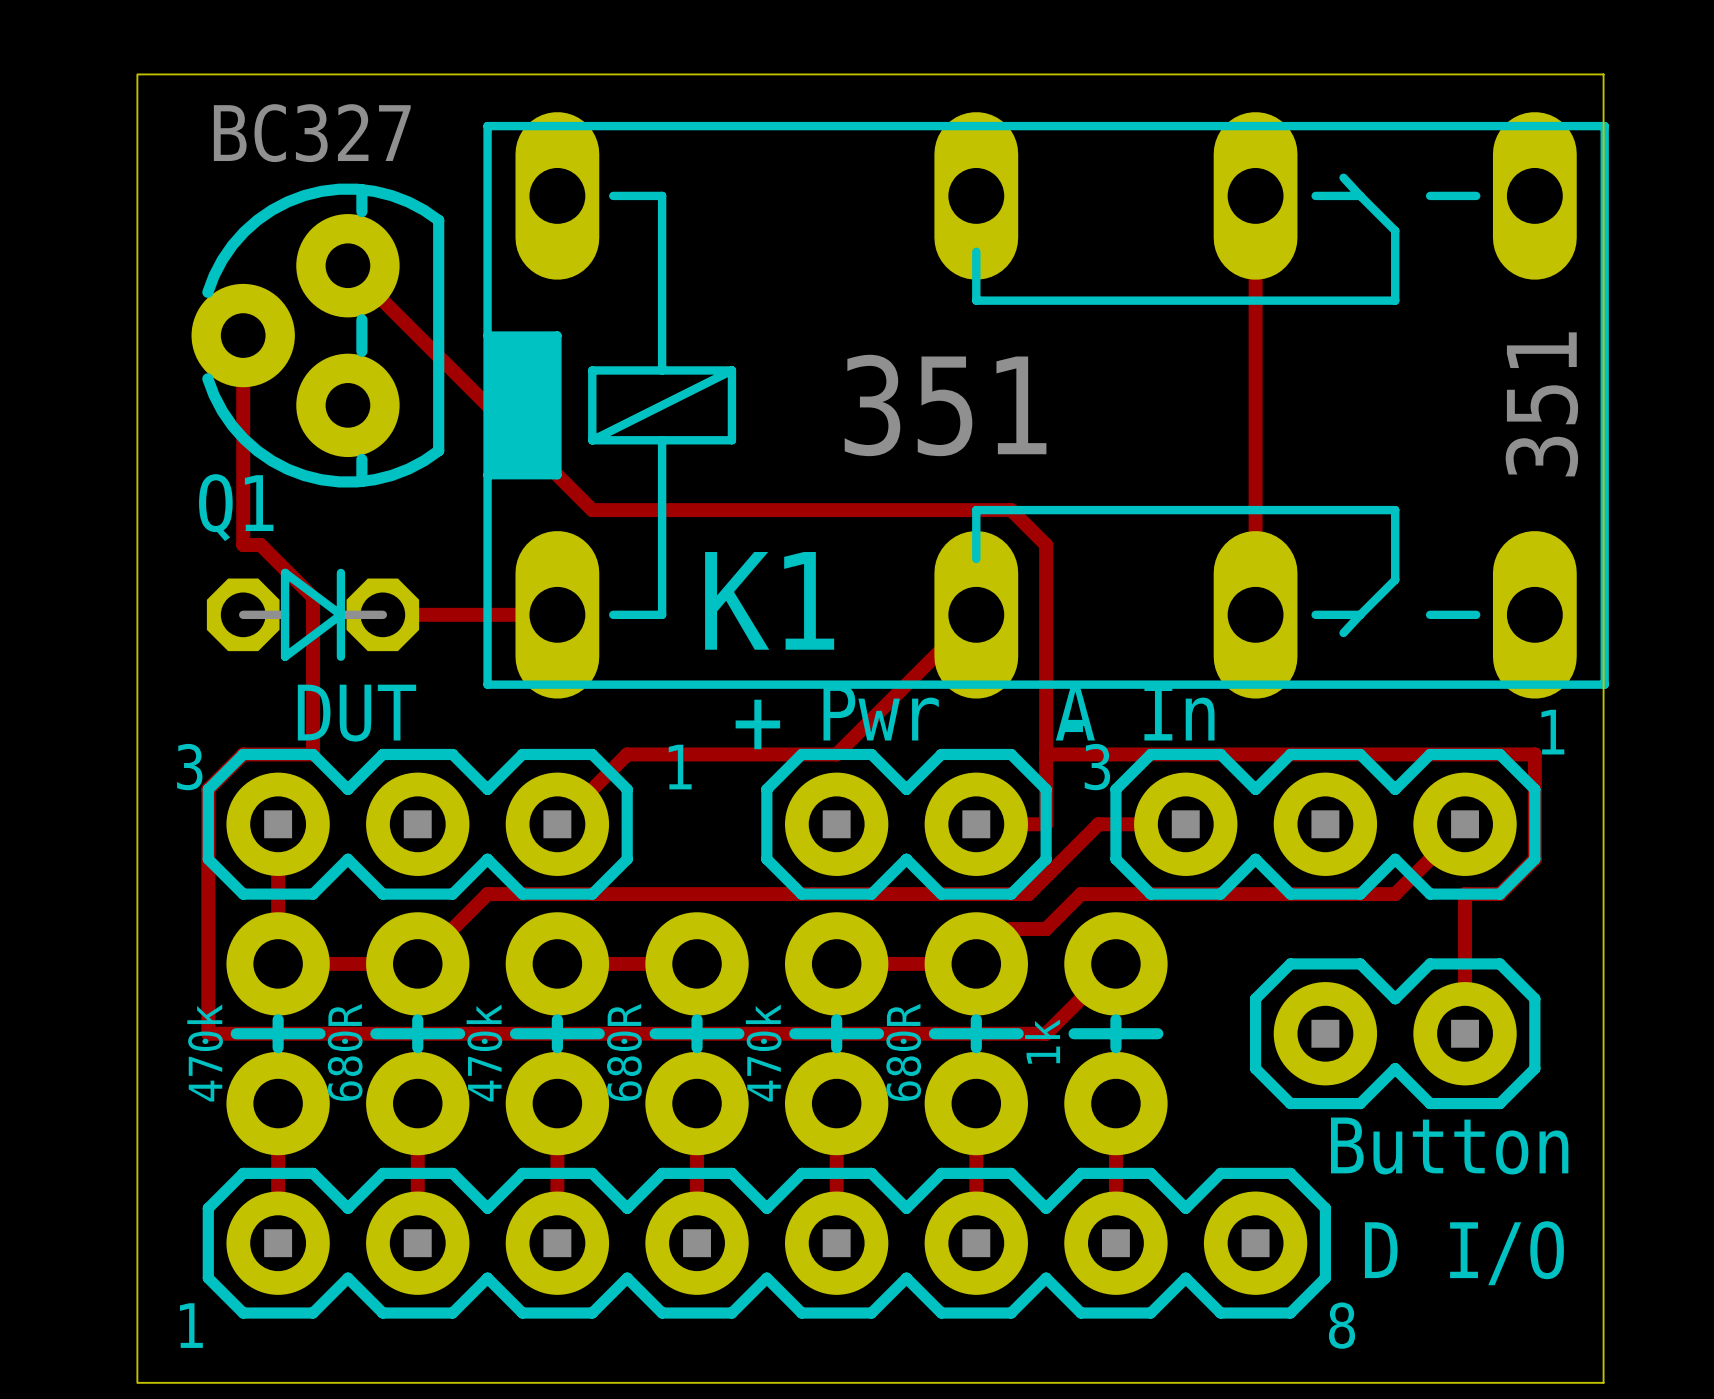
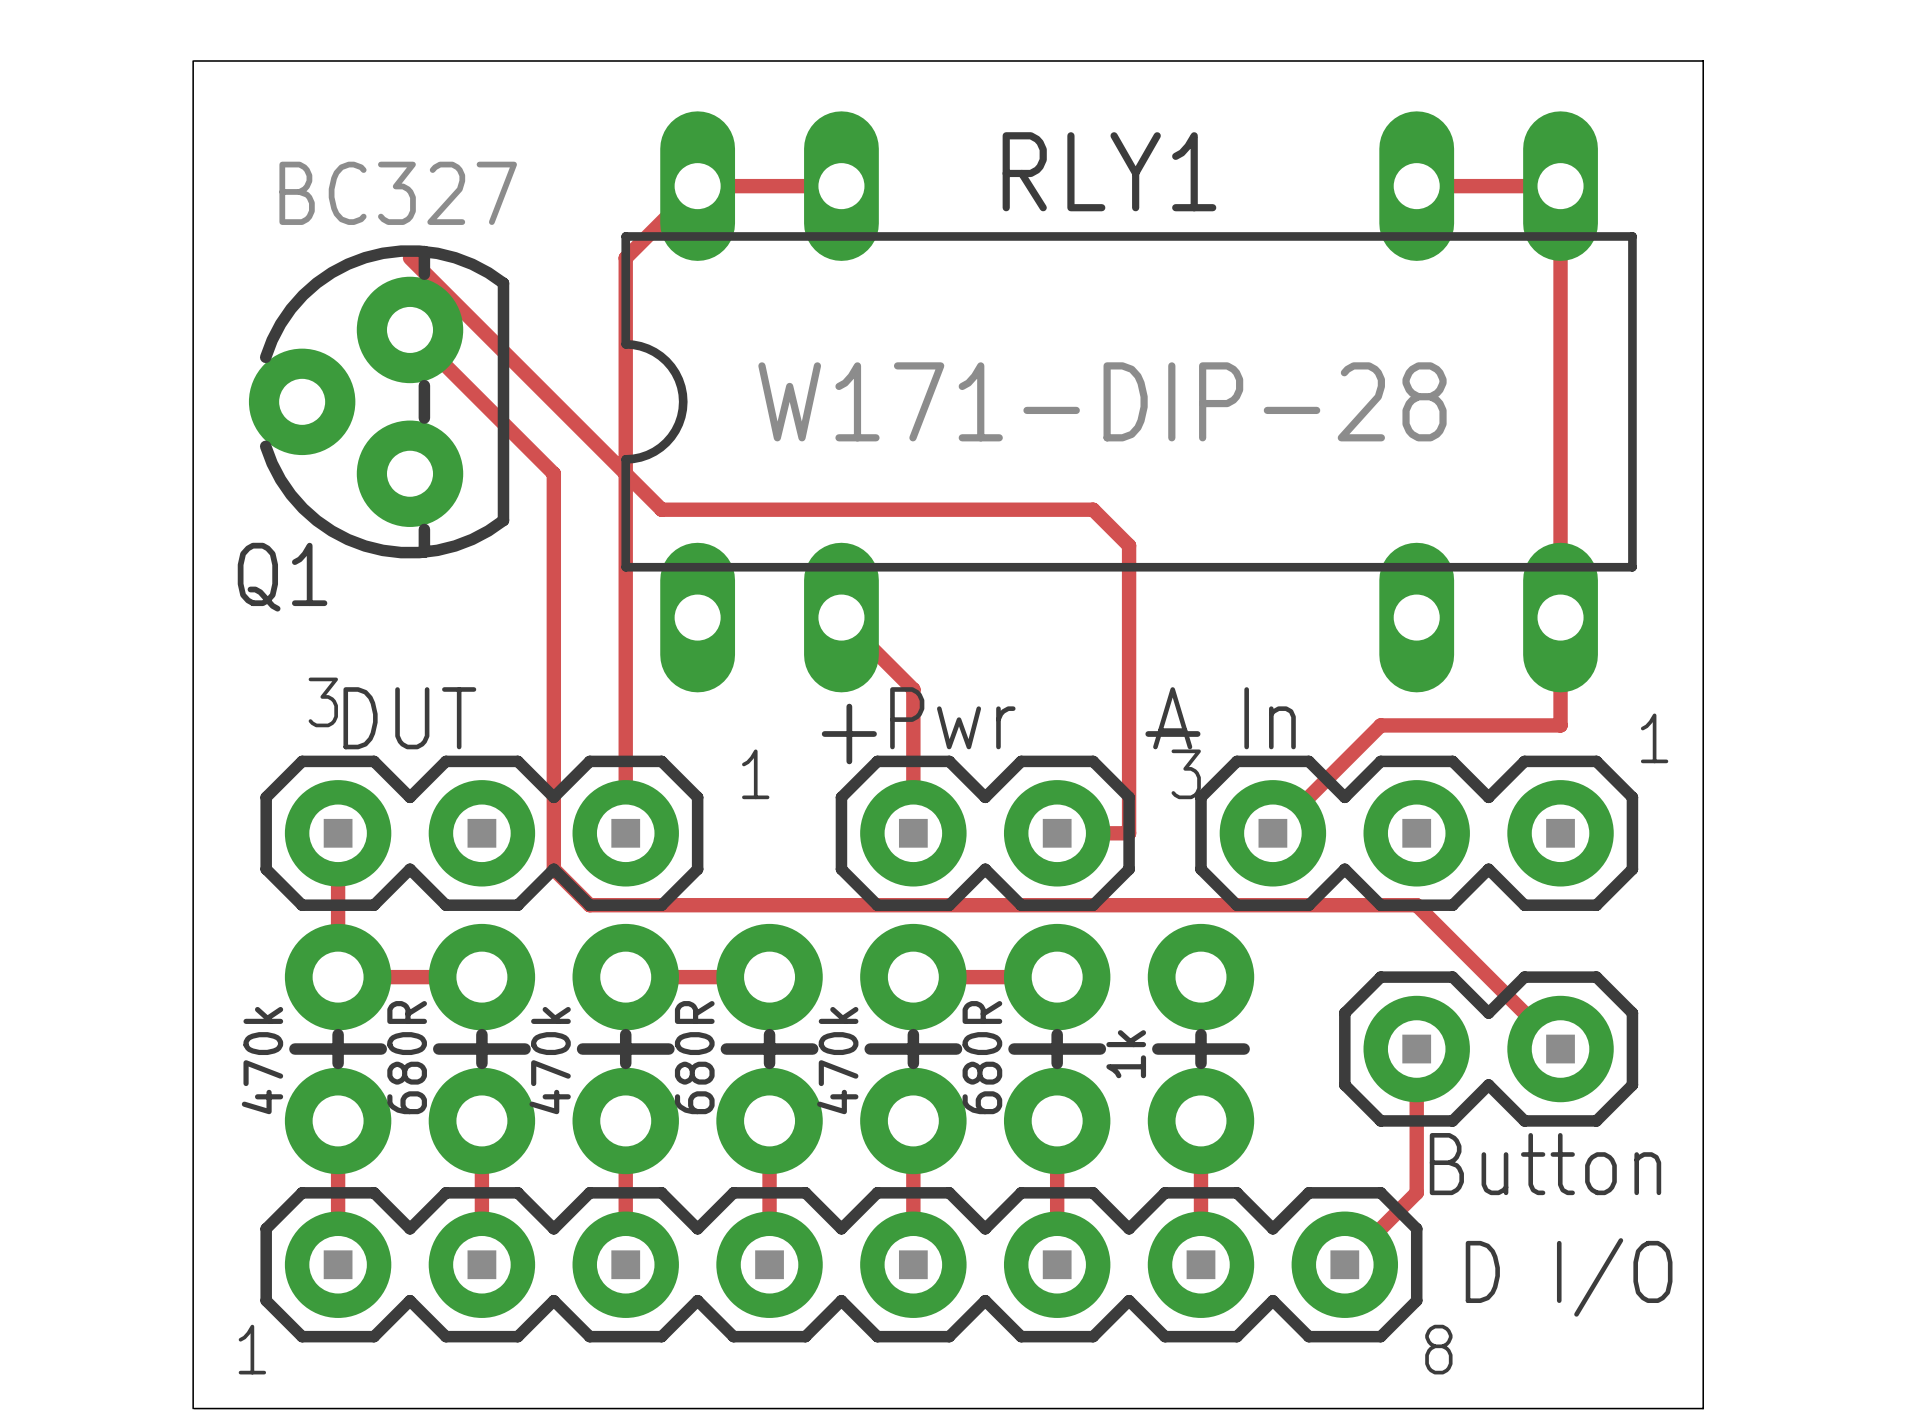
track: (1255, 195) (1255, 614) -> none
track: (243, 335) (243, 545) (260, 545) (313, 597) (313, 754) (243, 754) (208, 789) (208, 1033) (1046, 1033) (1115, 963) -> none
Q1 position: (317, 335) -> (379, 401)
K1: 351 (1046, 405) -> none
RLY1: none -> W171-DIP-28 (1129, 401)
part: (313, 614) -> none
track: (382, 614) (557, 614) -> none
track: none -> (841, 617) (913, 689) (913, 833)
track: (976, 614) (836, 754) (627, 754) (557, 824) -> (841, 186) (697, 186) (625, 258) (625, 833)
track: (1046, 754) (1534, 754) (1534, 859) (1499, 894) (1465, 894) (1465, 1033) -> none
text position: 3 (189, 767) -> 3 (323, 702)
track: (1185, 824) (1098, 824) (1028, 894) -> (1272, 833) (1380, 725) (1560, 725) (1560, 186) (1416, 186)
track: (1465, 824) (1395, 894) (1325, 894) -> (1560, 1049) (1416, 905)
track: (522, 894) (487, 894) (417, 963) -> (589, 905) (553, 869) (553, 473) (410, 329)
track: (1081, 894) (1046, 929) (1011, 929) (976, 963) -> (1165, 905) (1111, 905)
track: none -> (1416, 1049) (1416, 1192) (1344, 1264)

